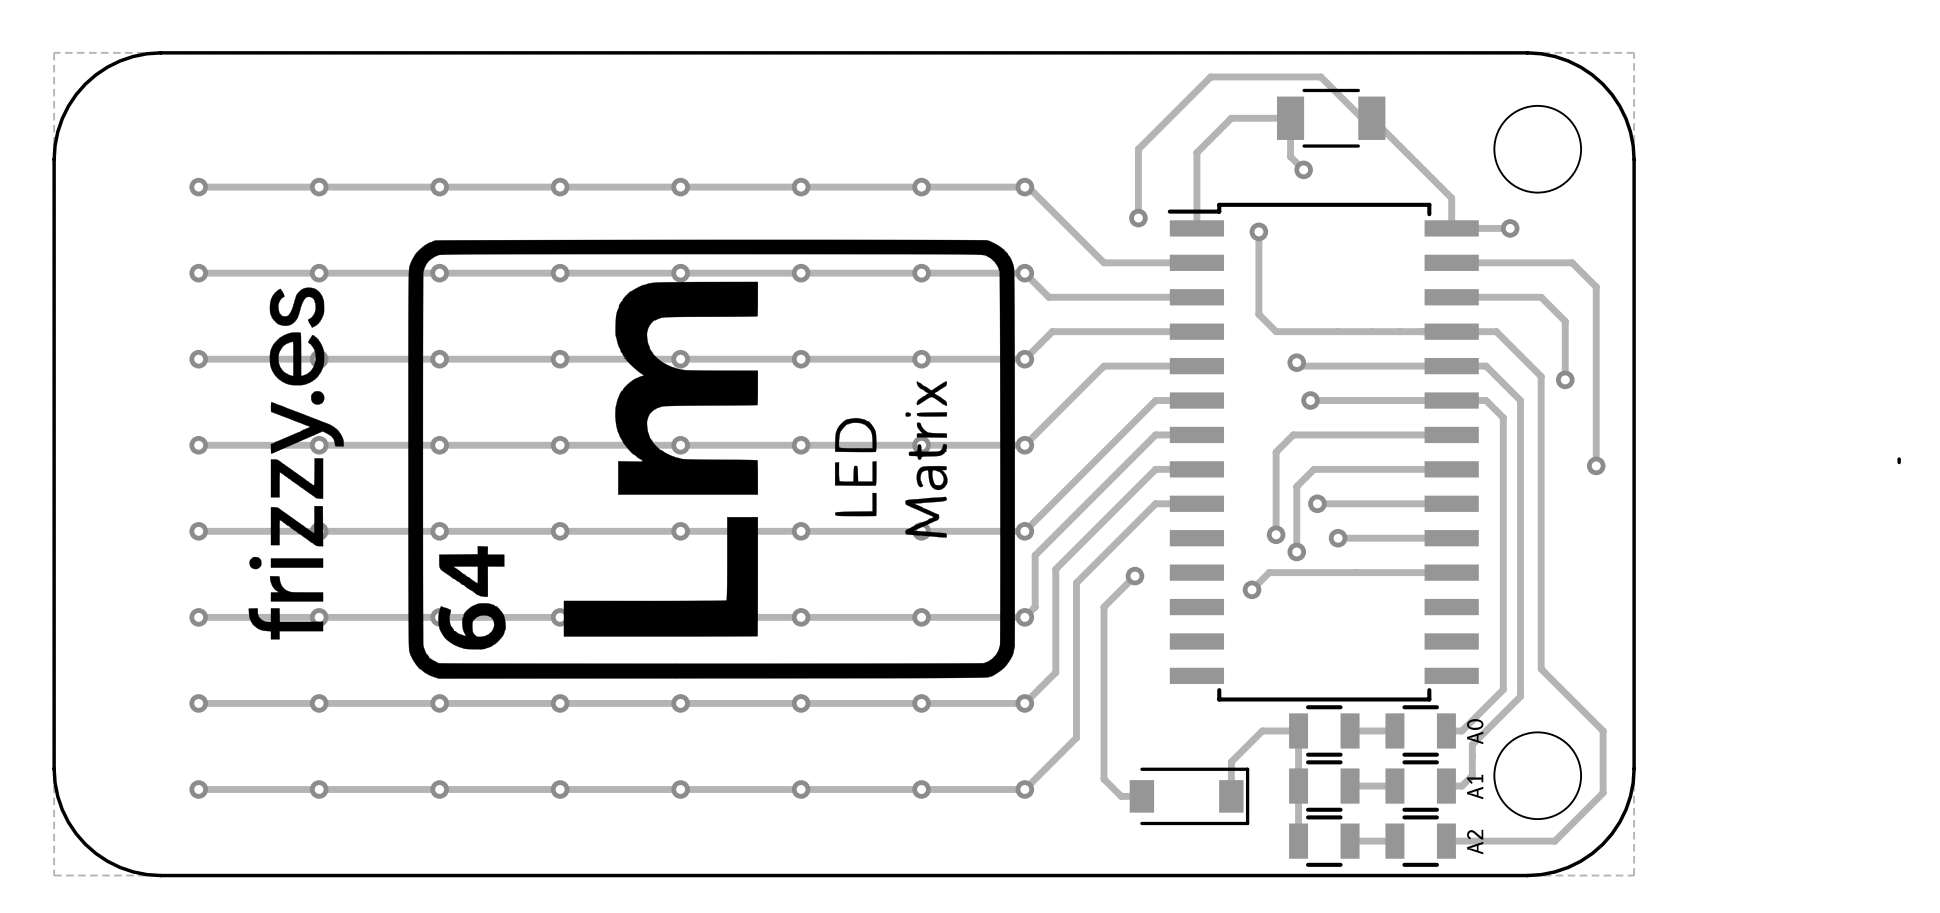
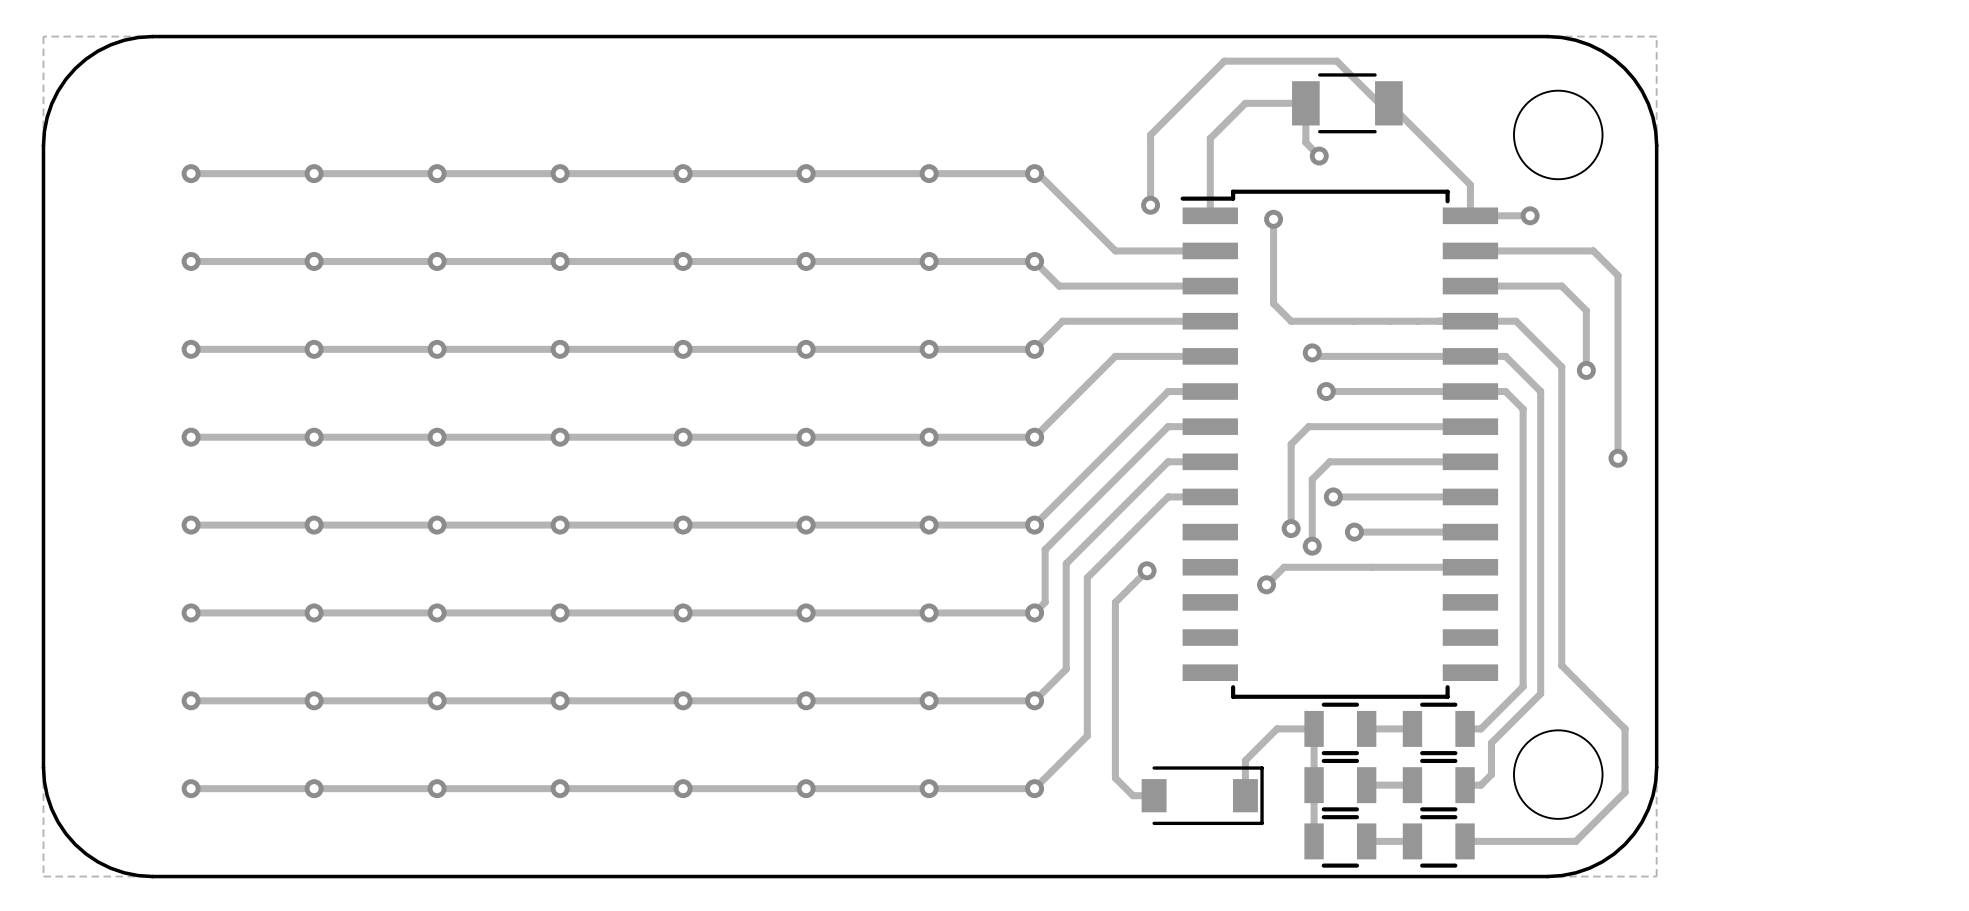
drawing: [408, 239, 1015, 679] -> none
drawing: [248, 287, 344, 640] -> none
line: (1899, 459) (1899, 462) -> none
text: A0 (1475, 731) -> none
text: A1 (1475, 787) -> none
text: A2 (1475, 842) -> none

